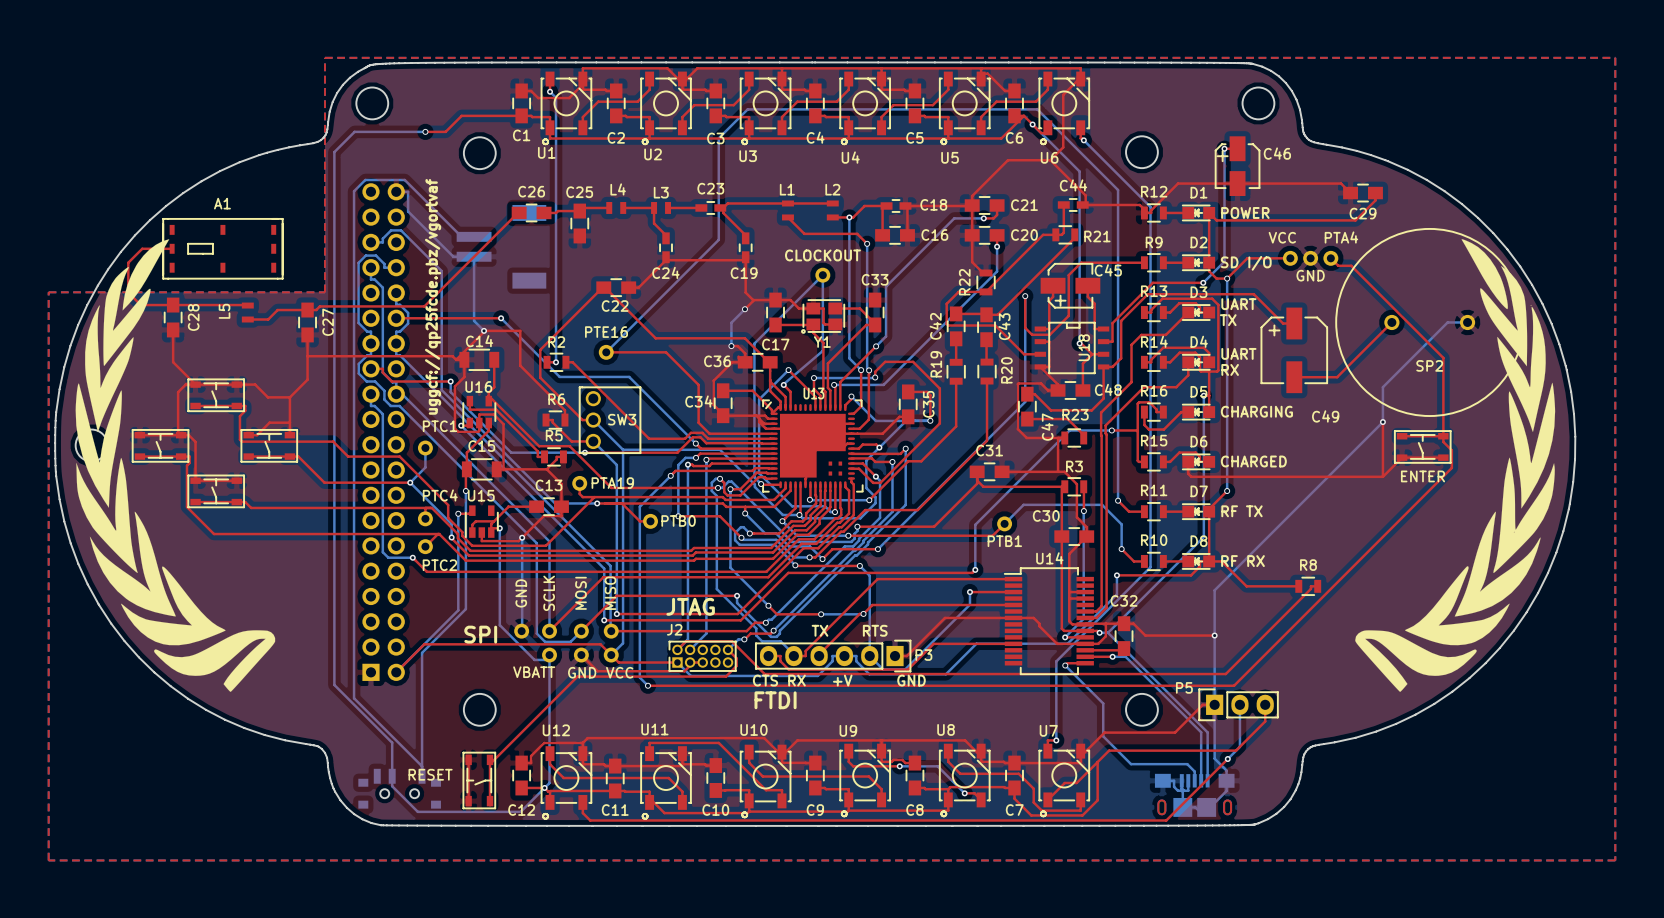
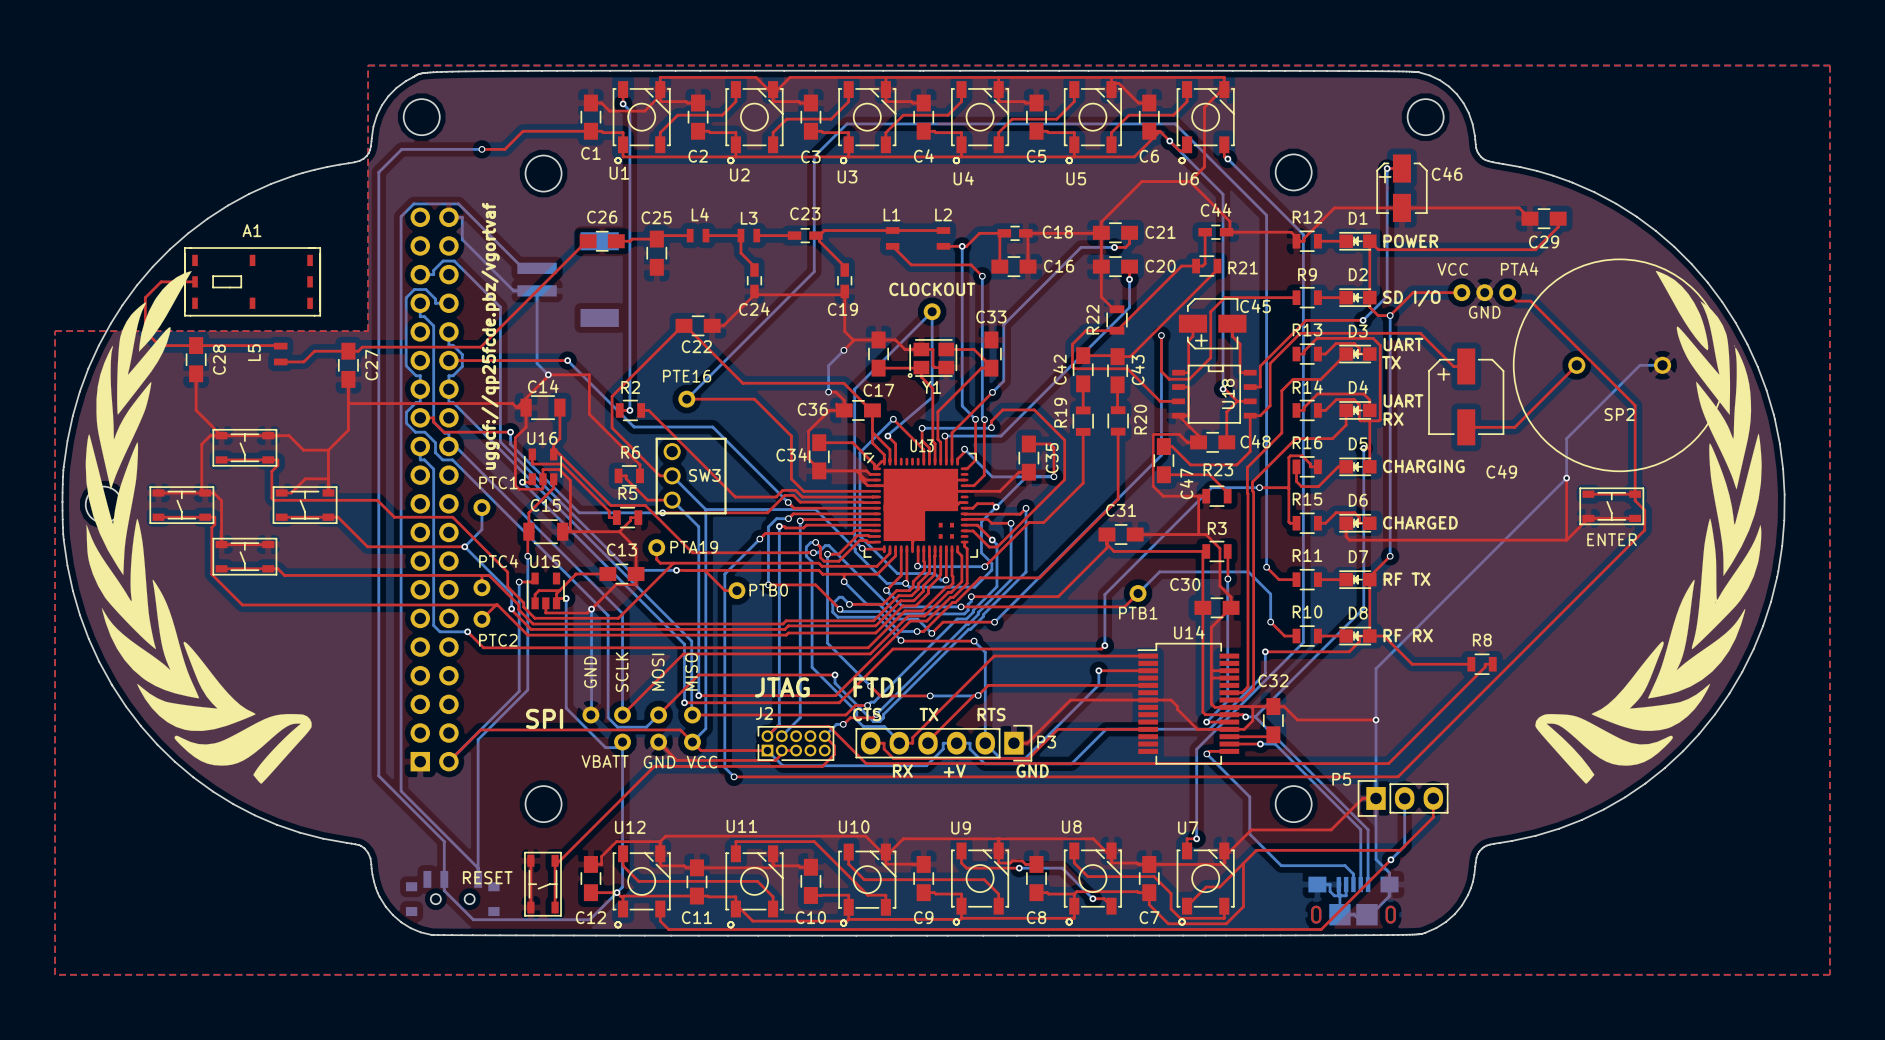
text position: CTS (765, 680) -> CTS (867, 714)
text position: FTDI (775, 700) -> FTDI (877, 687)

